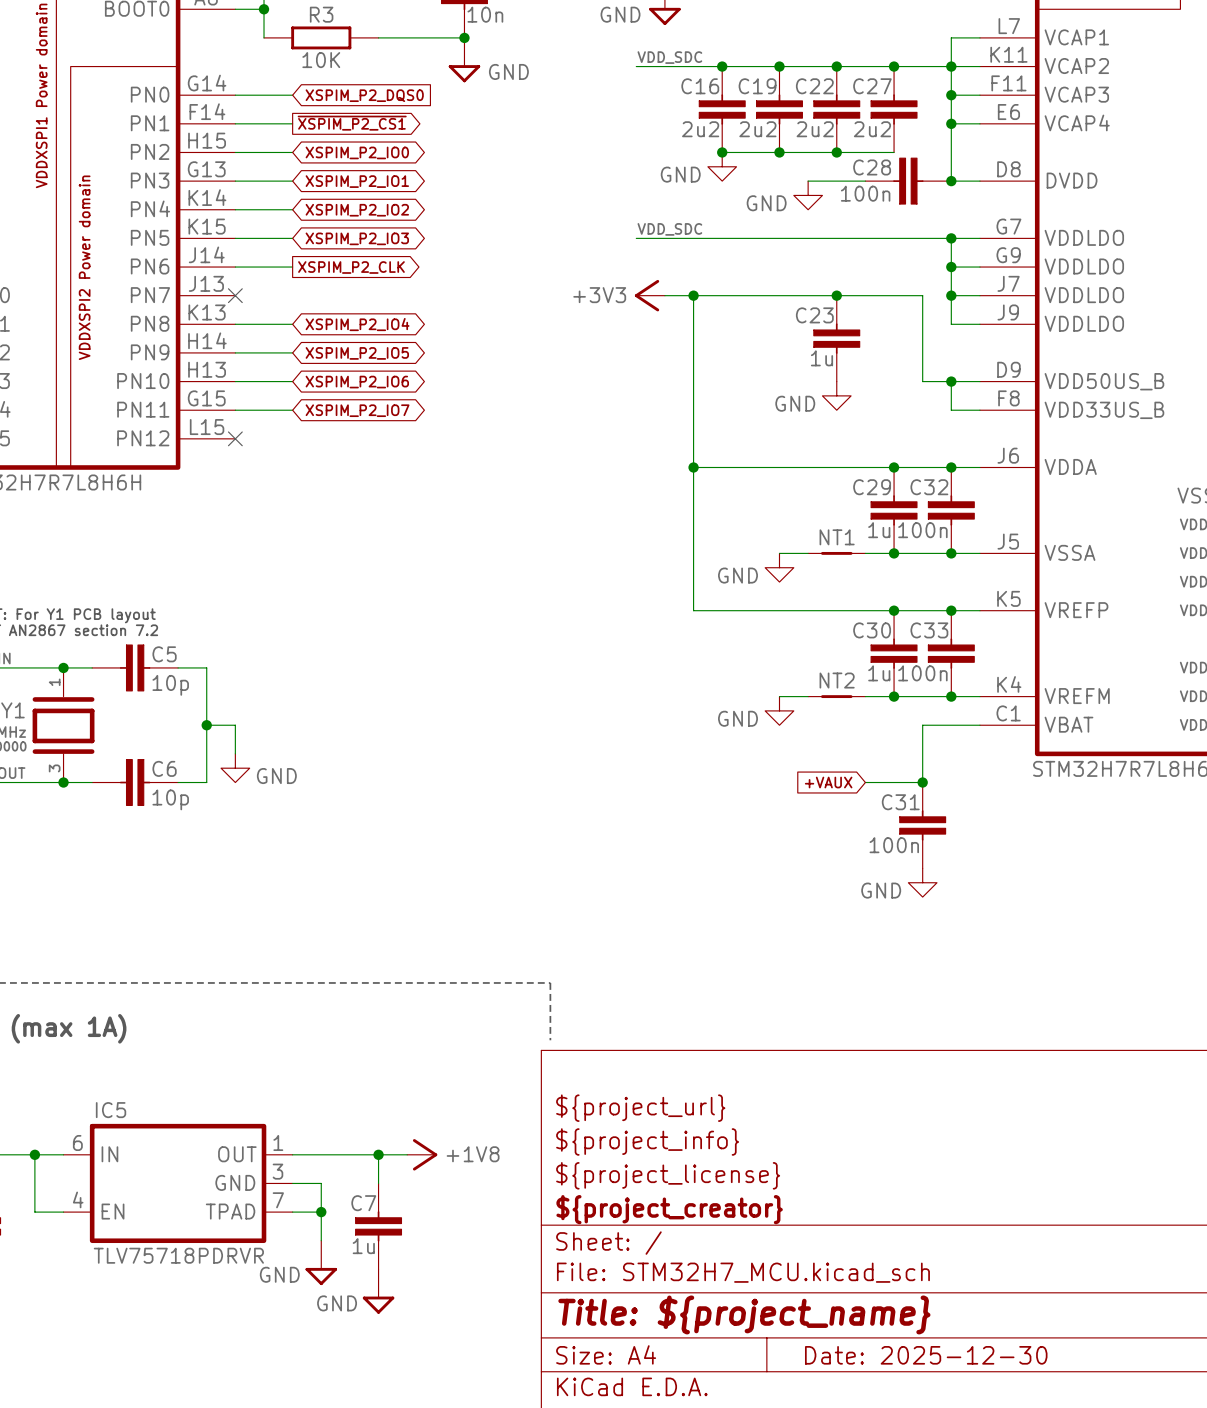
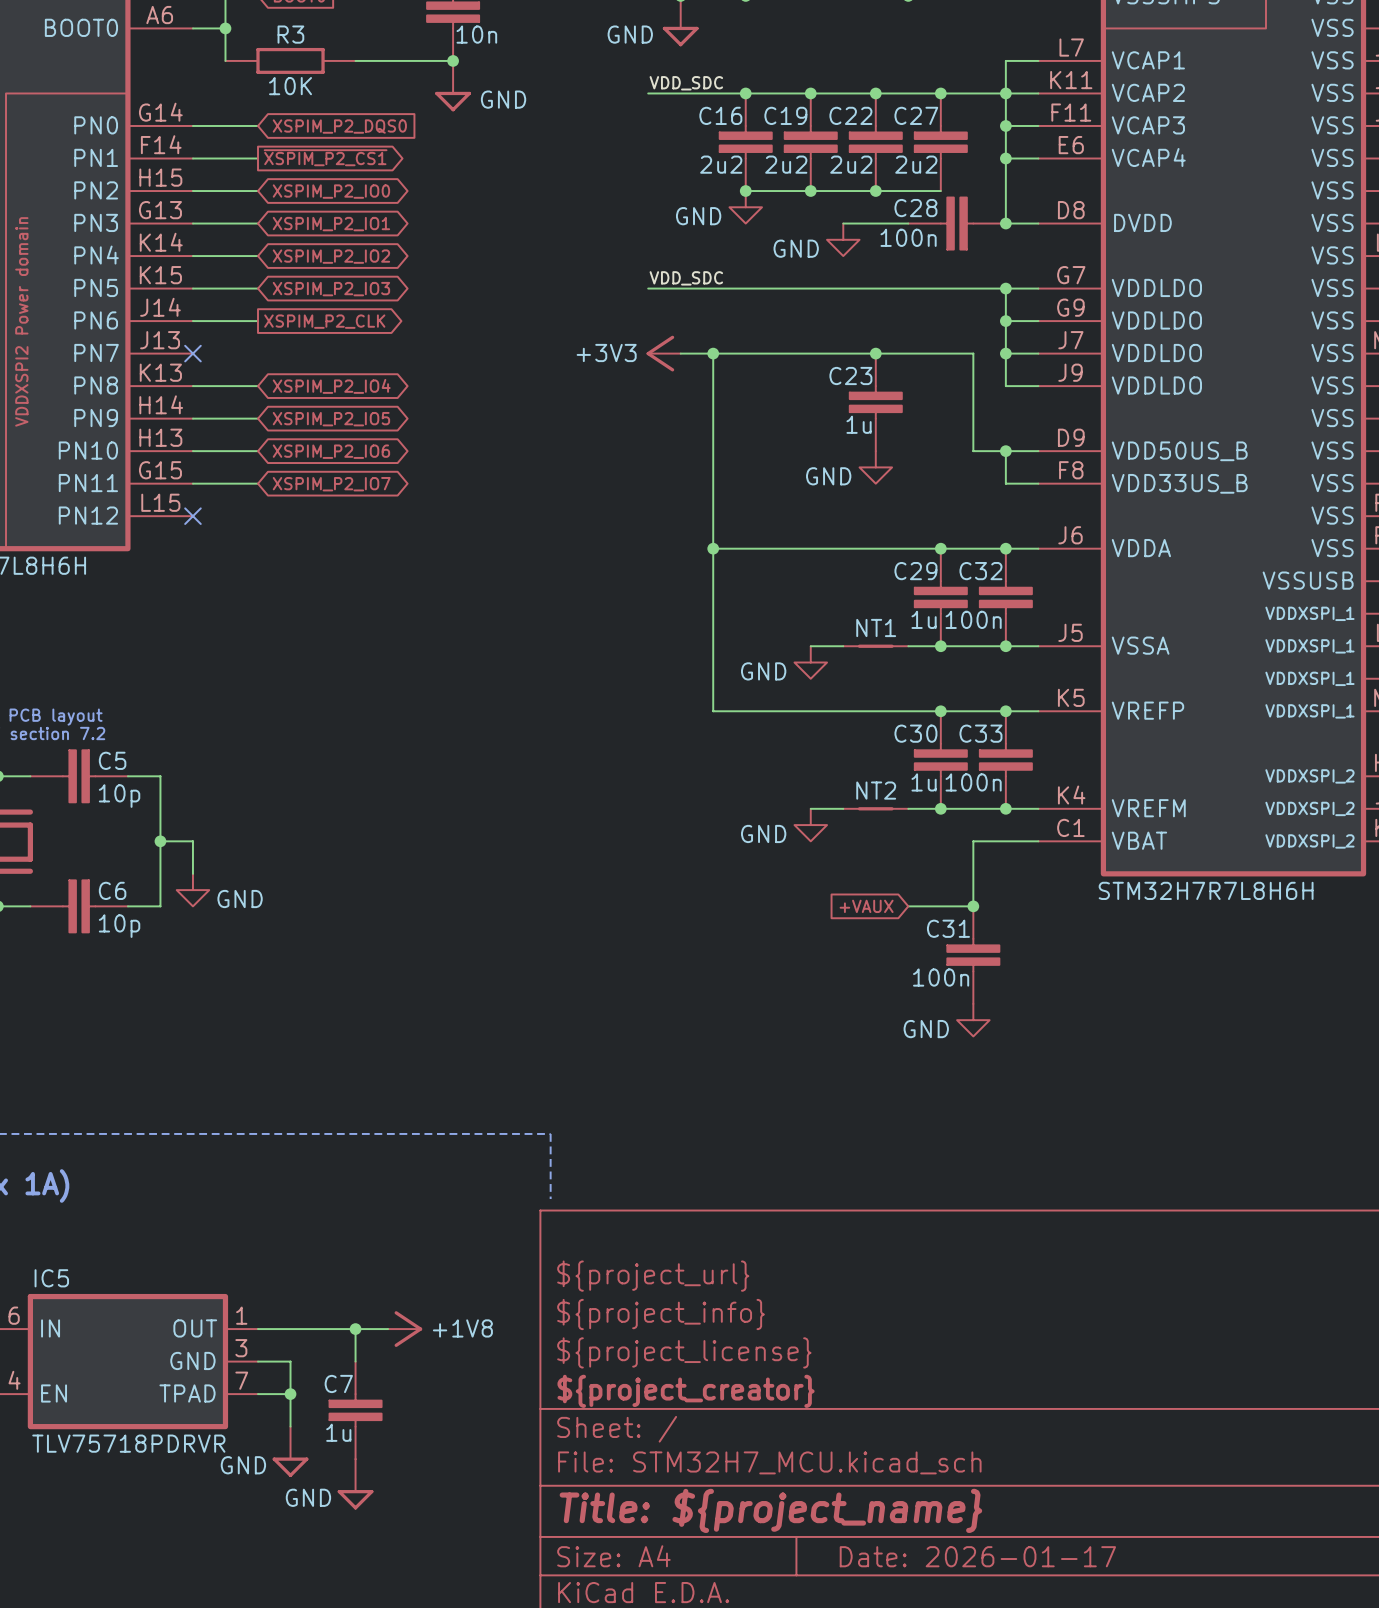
title block: Date: 2025-12-30 (926, 1355) -> Date: 2026-01-17 (977, 1556)

